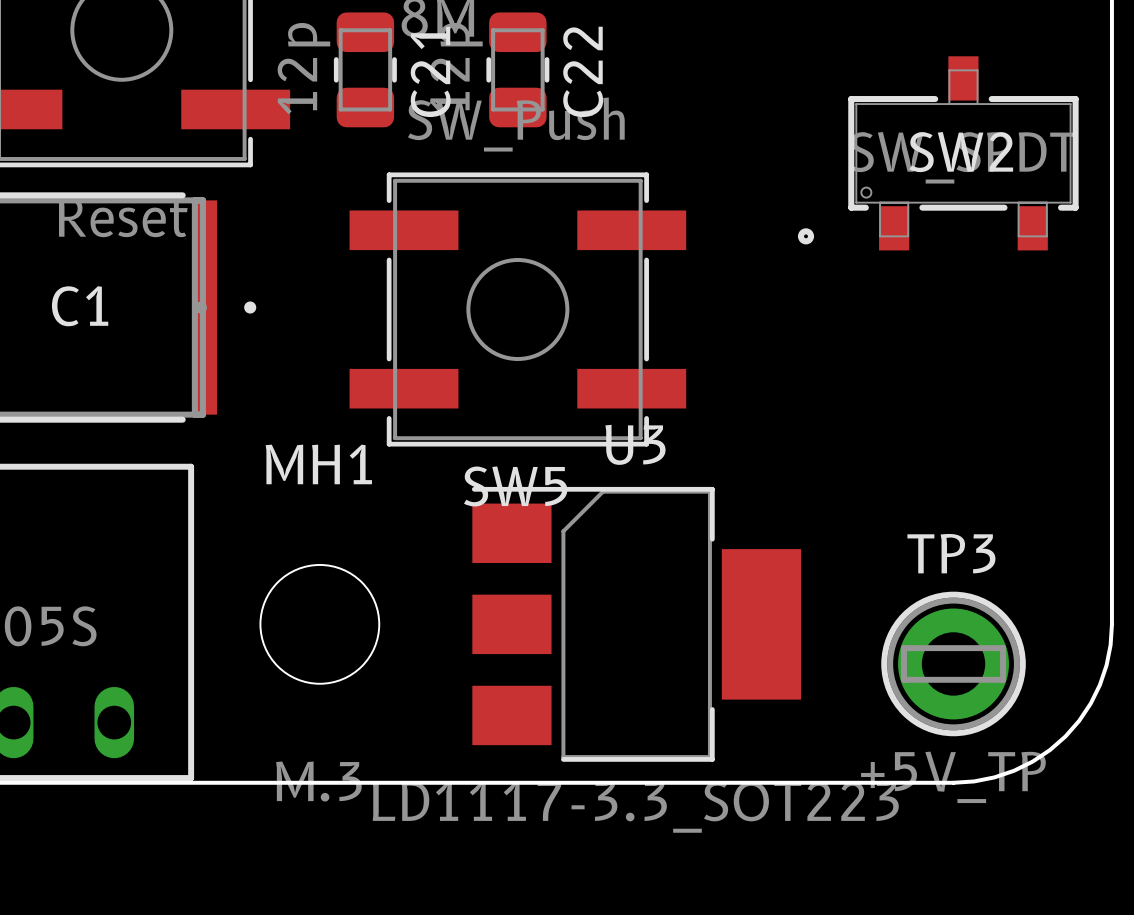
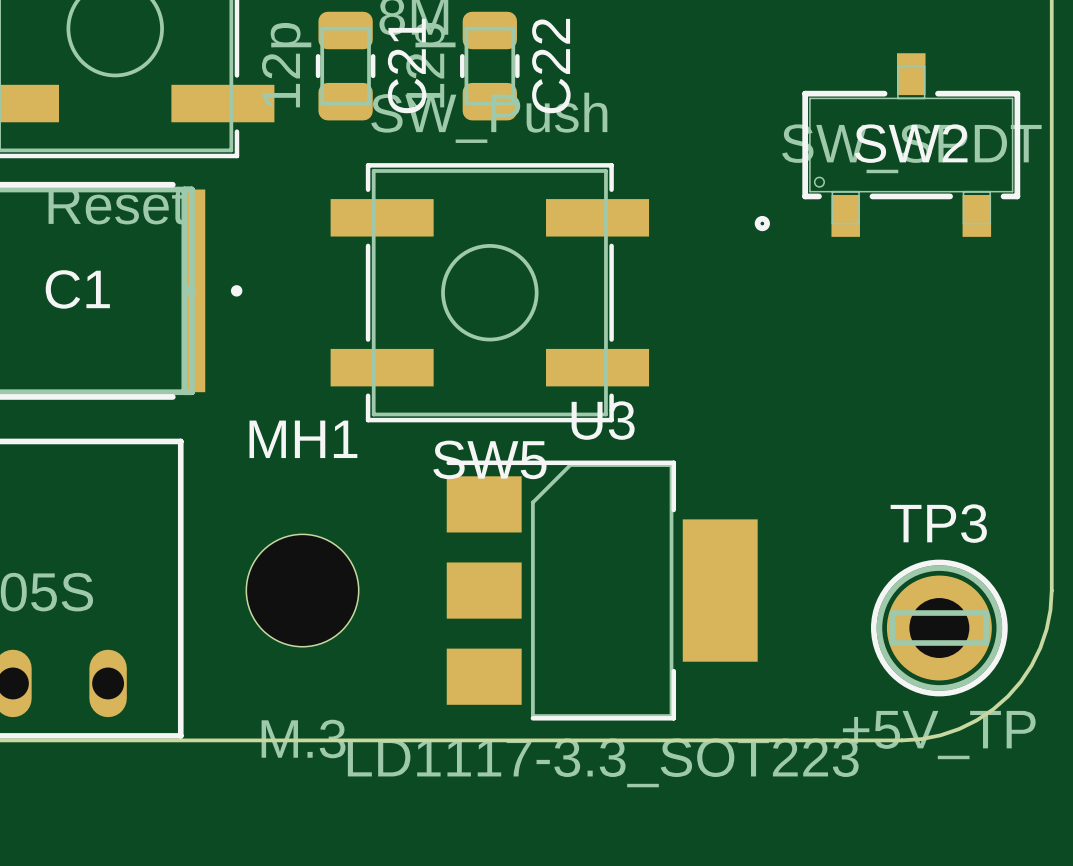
TP3 position: (953, 663) -> (939, 628)

